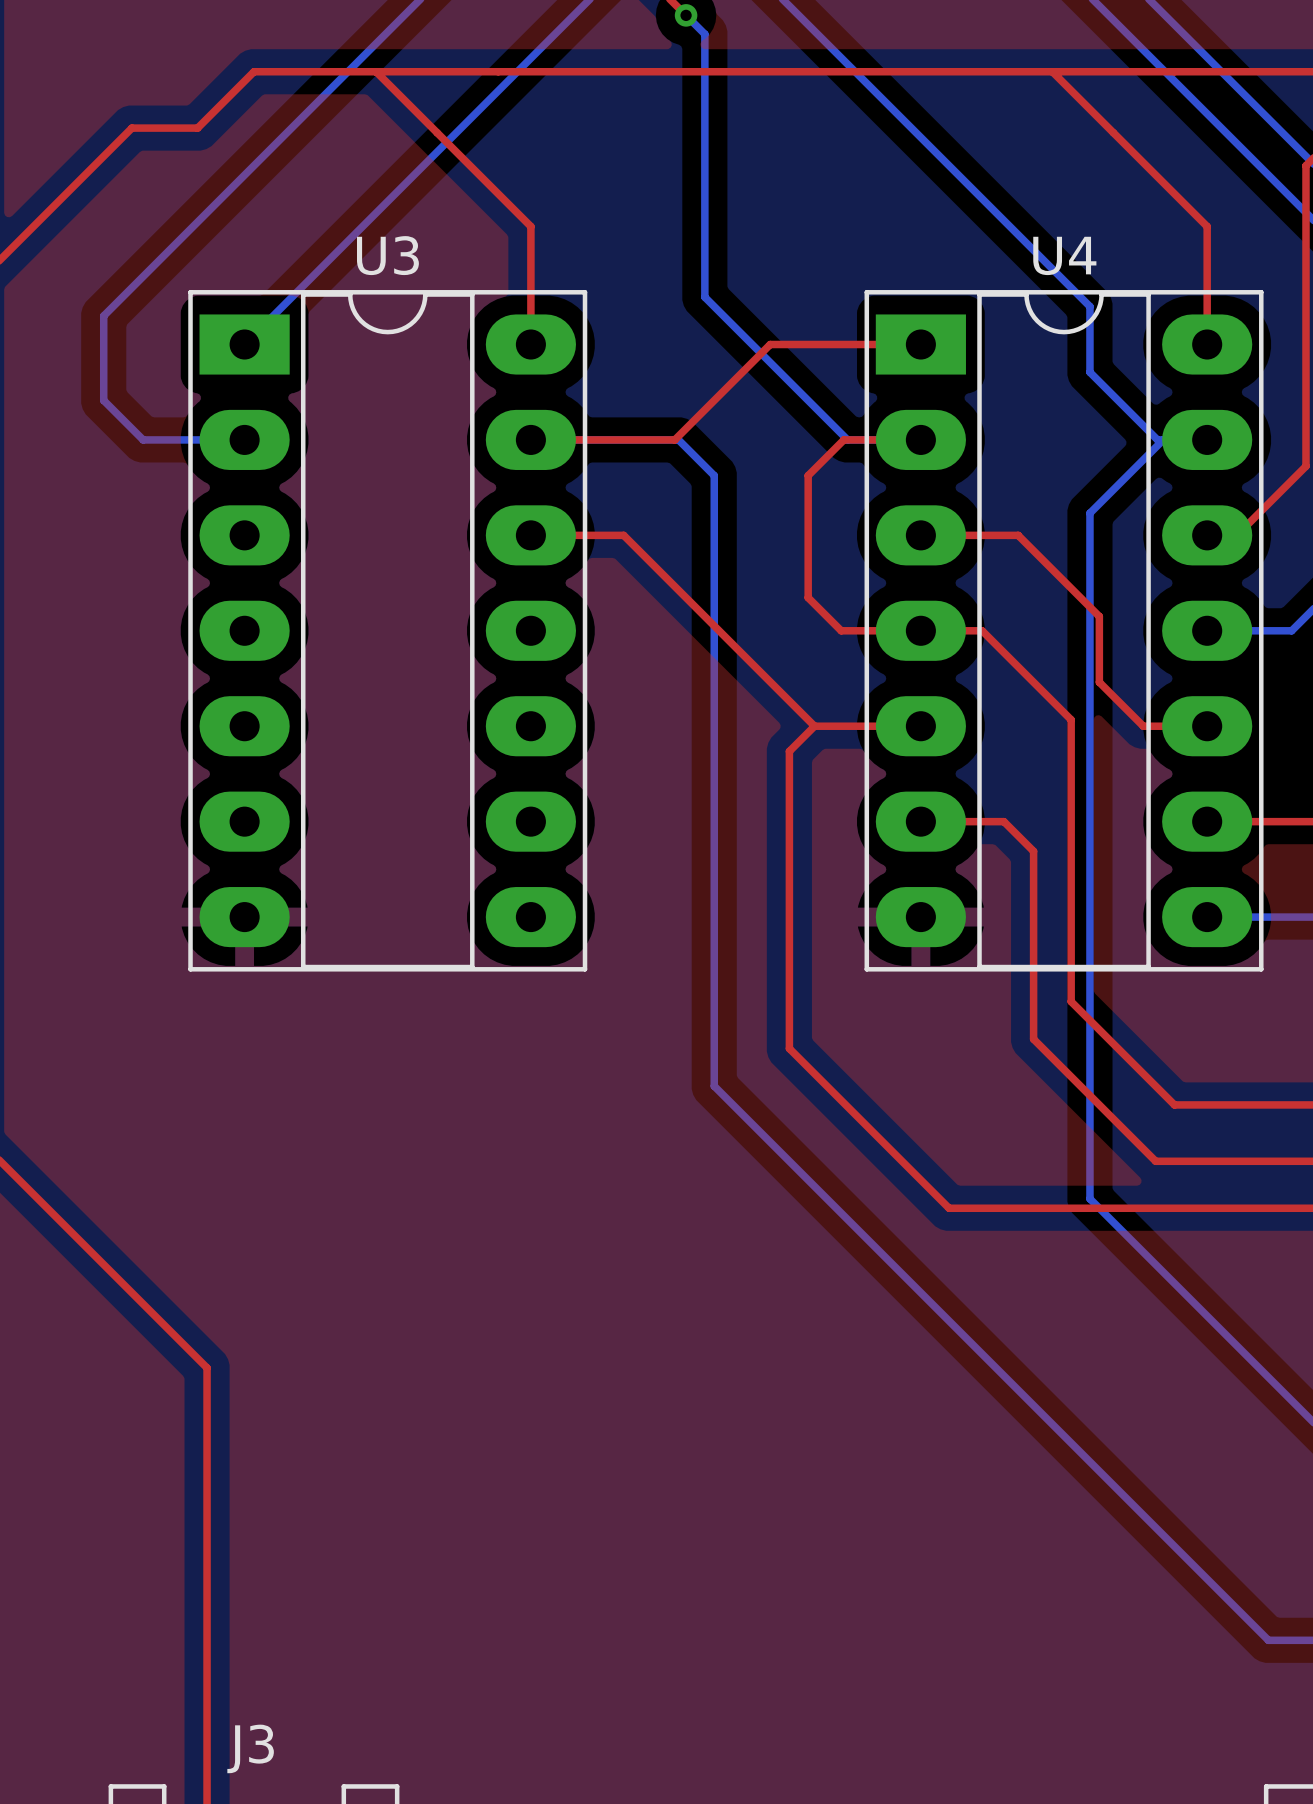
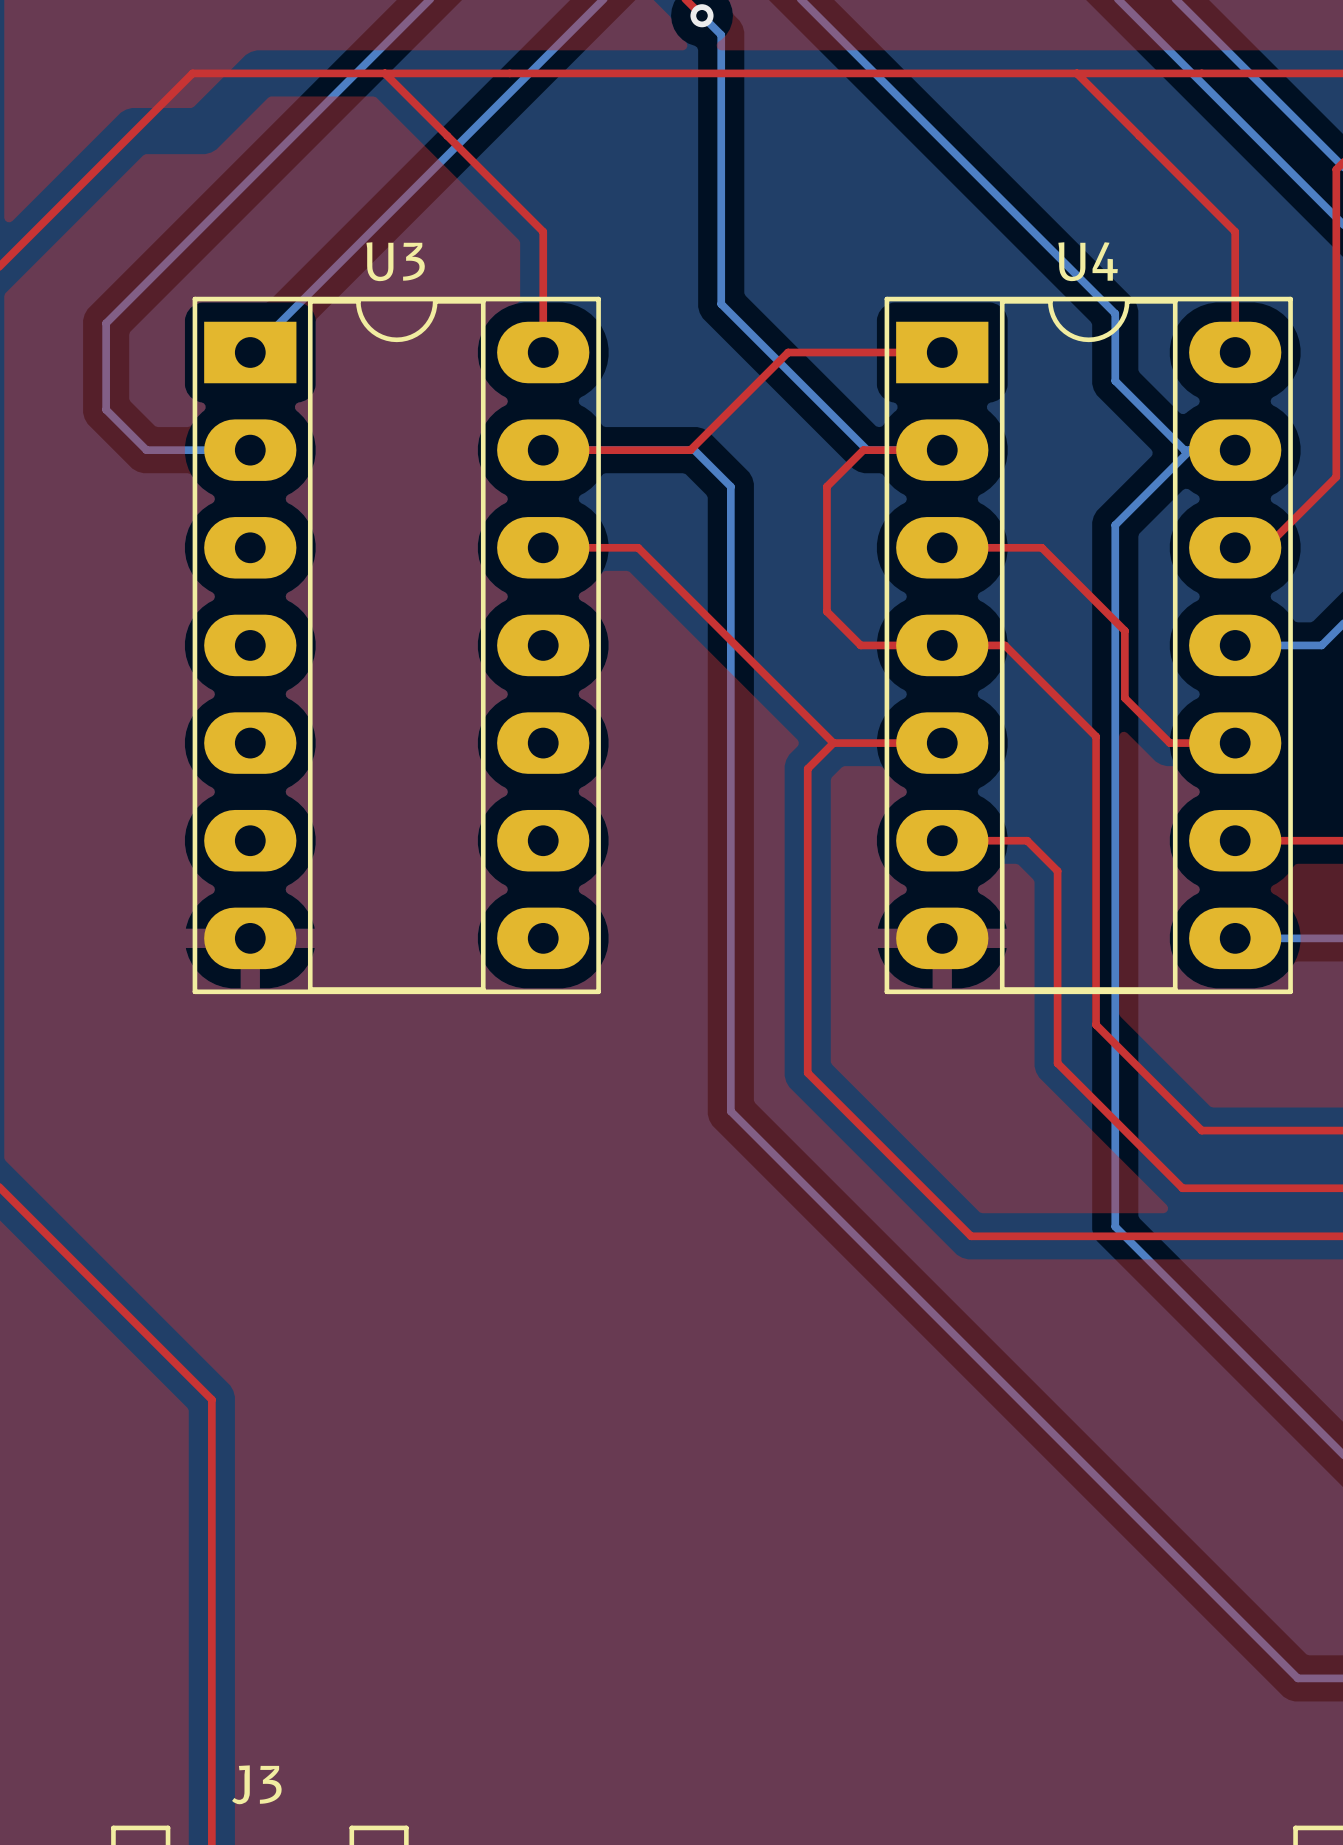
top track: (254, 71) (197, 128) (131, 128) -> (259, 73) (192, 73) (134, 131)

